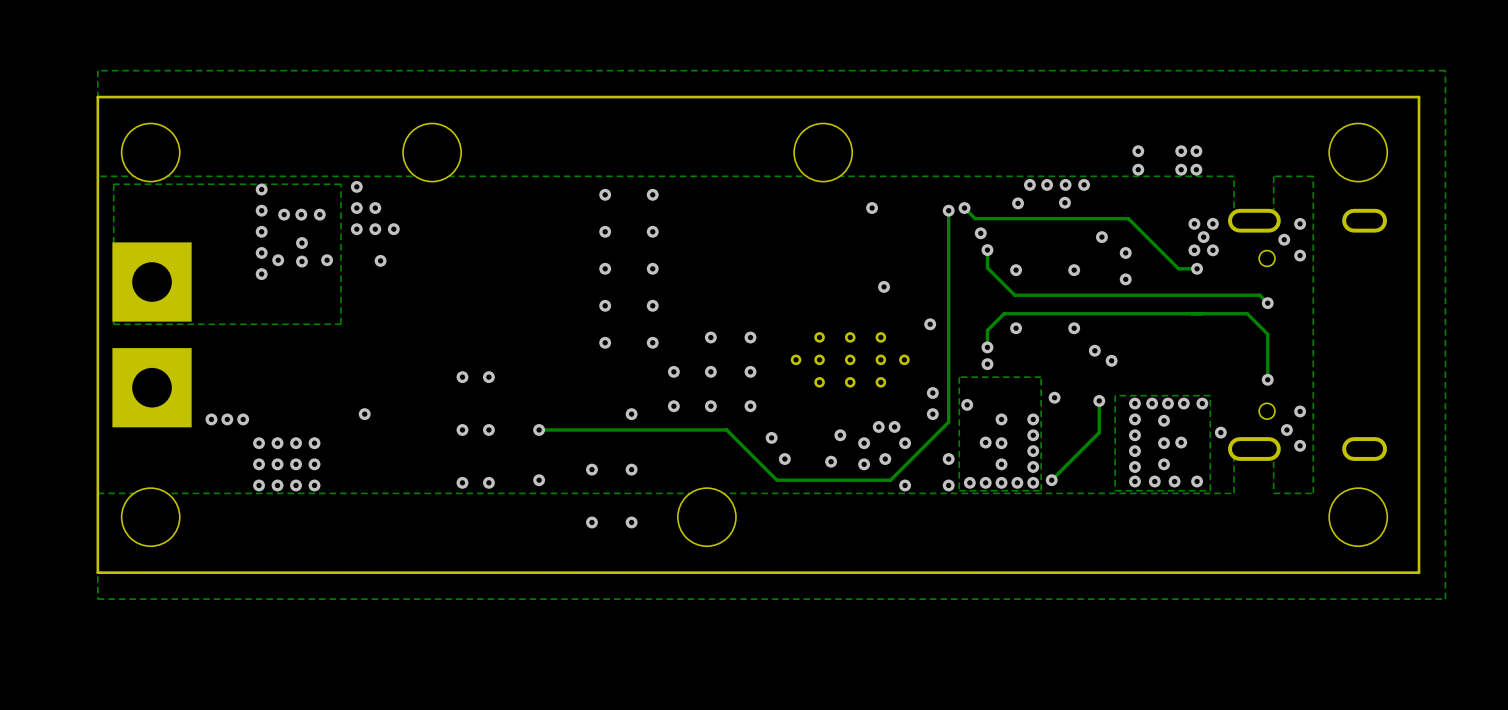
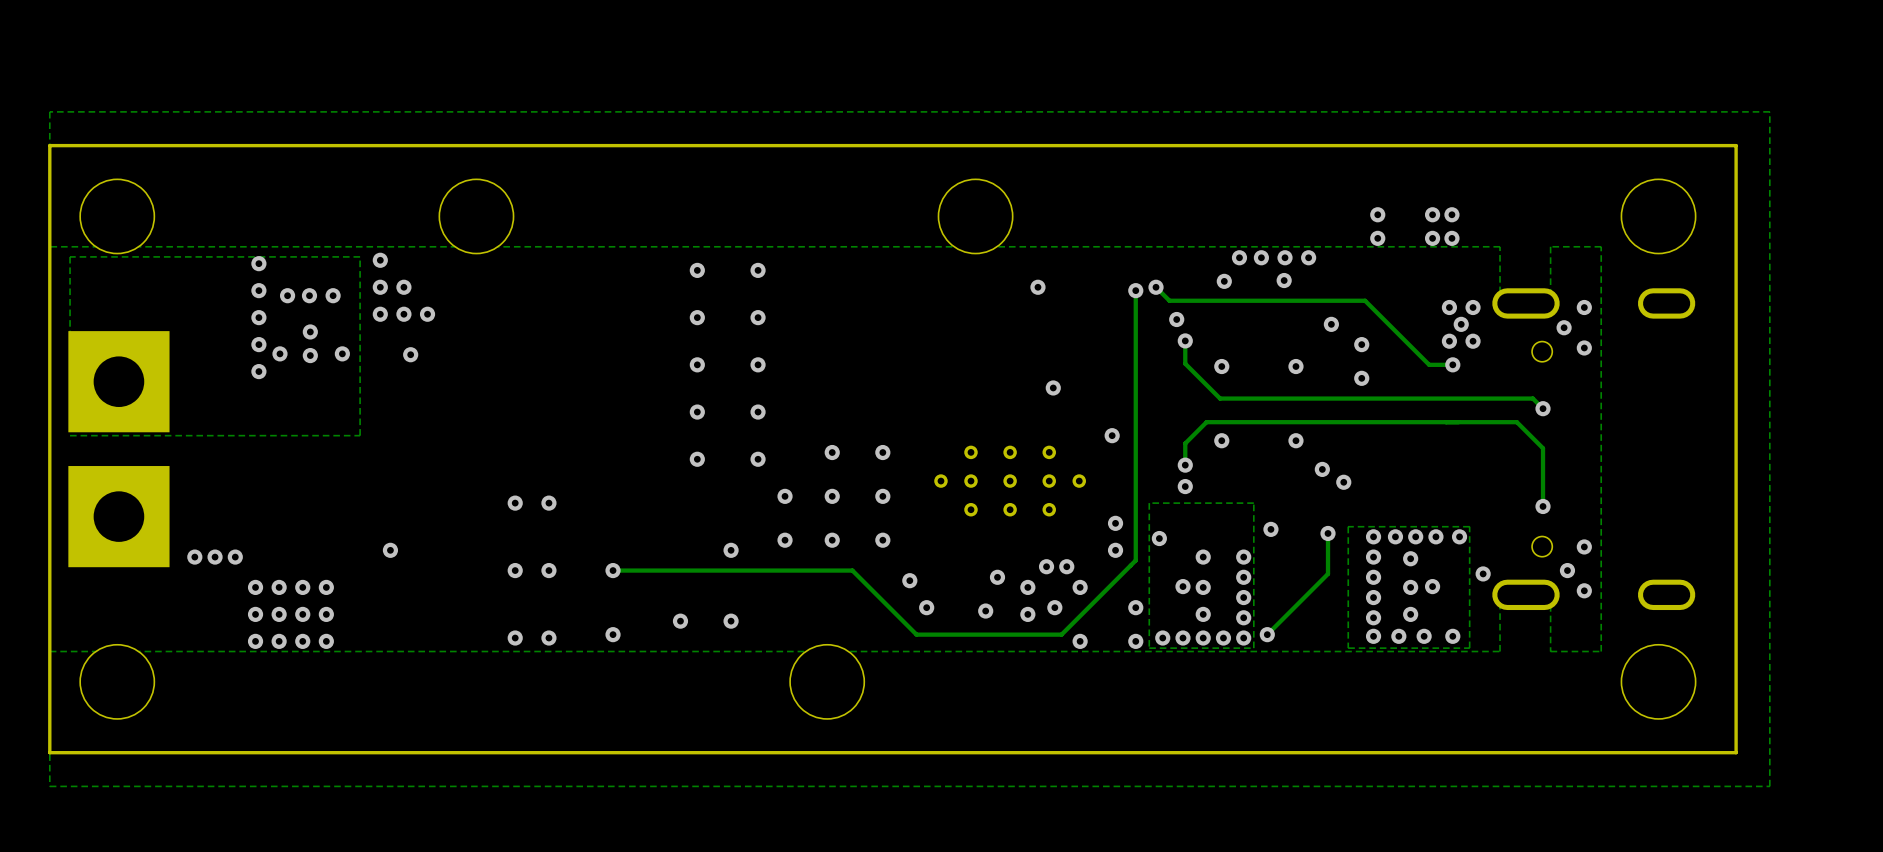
via: (591, 522) -> none
via: (631, 522) -> none

